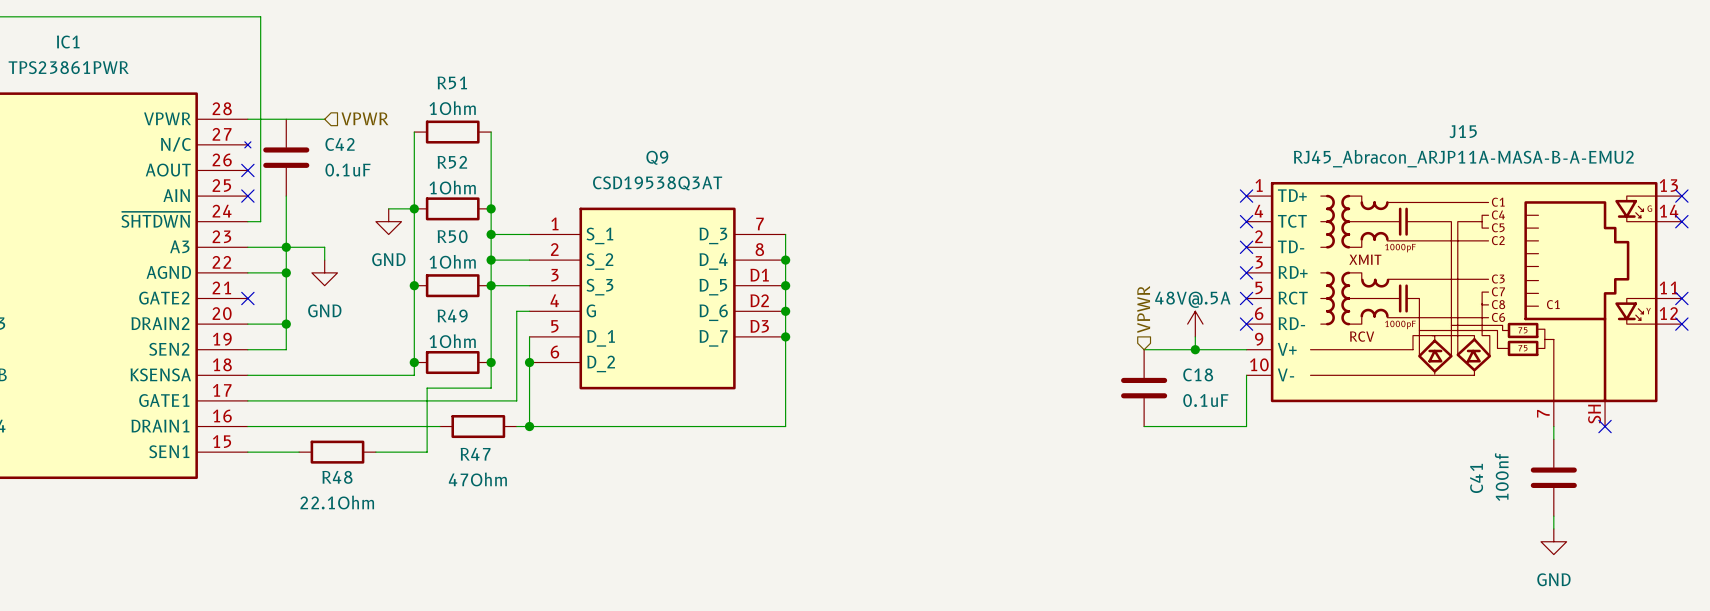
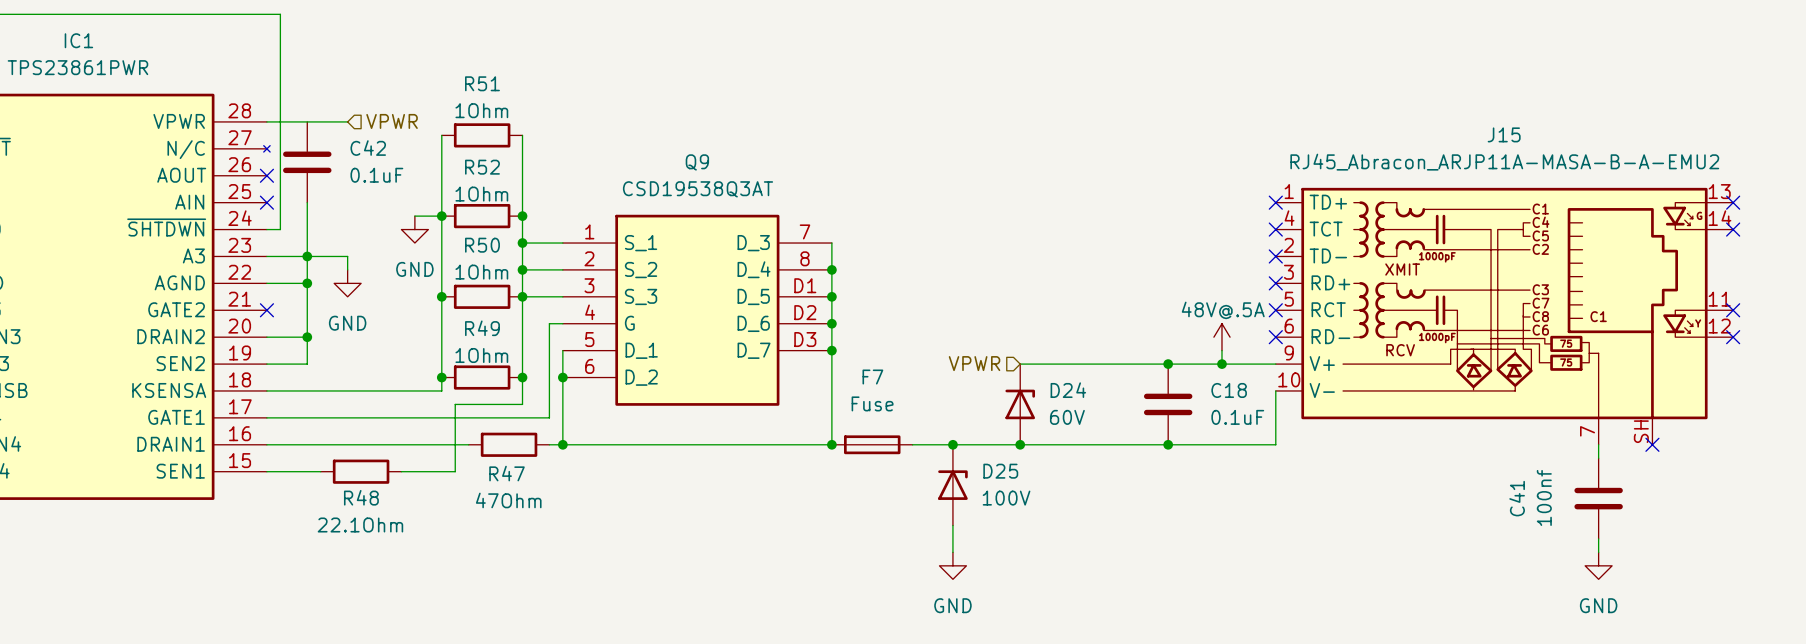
no-connect mark: none -> (1275, 202)
no-connect mark: (1246, 196) -> none
no-connect mark: none -> (1733, 202)
no-connect mark: (1681, 196) -> none
no-connect mark: none -> (1275, 229)
no-connect mark: (1246, 221) -> none
no-connect mark: none -> (1733, 229)
no-connect mark: (1681, 221) -> none
no-connect mark: none -> (1275, 256)
no-connect mark: (1246, 247) -> none
no-connect mark: none -> (1275, 283)
no-connect mark: (1246, 272) -> none
no-connect mark: none -> (1275, 310)
no-connect mark: (1246, 298) -> none
no-connect mark: none -> (1733, 310)
no-connect mark: (1681, 298) -> none
J15 position: (1464, 304) -> (1504, 316)
hierarchical label rotation: 0° (1143, 309) -> 90° counterclockwise (974, 363)
hierarchical label position: VPWR (1143, 309) -> VPWR (974, 363)
power symbol position: 48V@.5A (1195, 324) -> 48V@.5A (1221, 337)
no-connect mark: none -> (1275, 337)
no-connect mark: (1246, 324) -> none
no-connect mark: none -> (1733, 337)
no-connect mark: (1681, 324) -> none
wire: (1195, 336) (1195, 349) -> (1221, 350) (1221, 364)
wire: none -> (1020, 364) (1208, 364)
junction: none -> (1168, 364)
junction position: (1195, 349) -> (1221, 364)
wire: (1246, 375) (1246, 426) (1208, 426) -> (1275, 390) (1275, 444)
D24: none -> 60V (1020, 404)
C18 position: (1144, 388) -> (1168, 404)
junction: none -> (831, 444)
F7: none -> Fuse (872, 444)
wire: none -> (912, 444) (1208, 444)
junction: none -> (952, 444)
junction: none -> (1020, 444)
junction: none -> (1168, 444)
wire: (1553, 426) (1553, 439) -> (1598, 444) (1598, 458)
no-connect mark position: (1605, 426) -> (1652, 444)
D25: none -> 100V (952, 485)
C41 position: (1553, 477) -> (1598, 498)
wire: none -> (952, 525) (952, 552)
wire: (1553, 516) (1553, 528) -> (1598, 538) (1598, 552)
power symbol: none -> GND (952, 565)
power symbol position: GND (1553, 541) -> GND (1598, 565)

